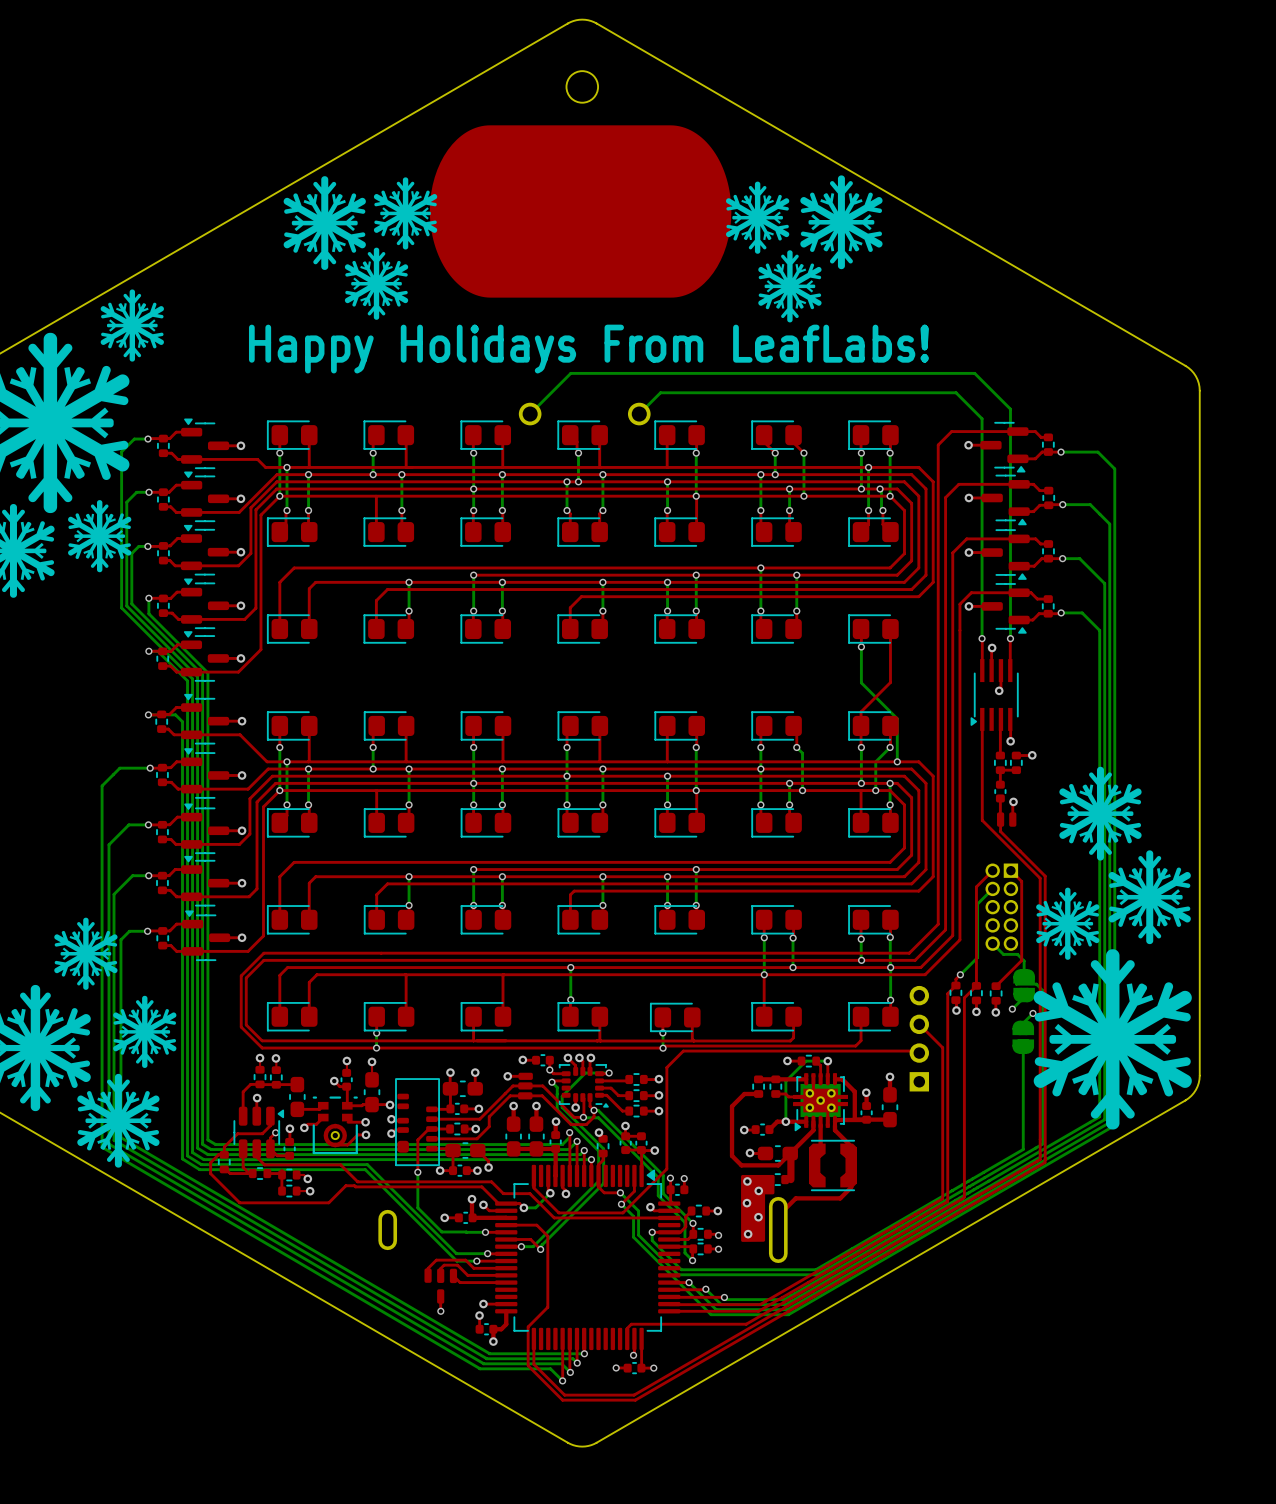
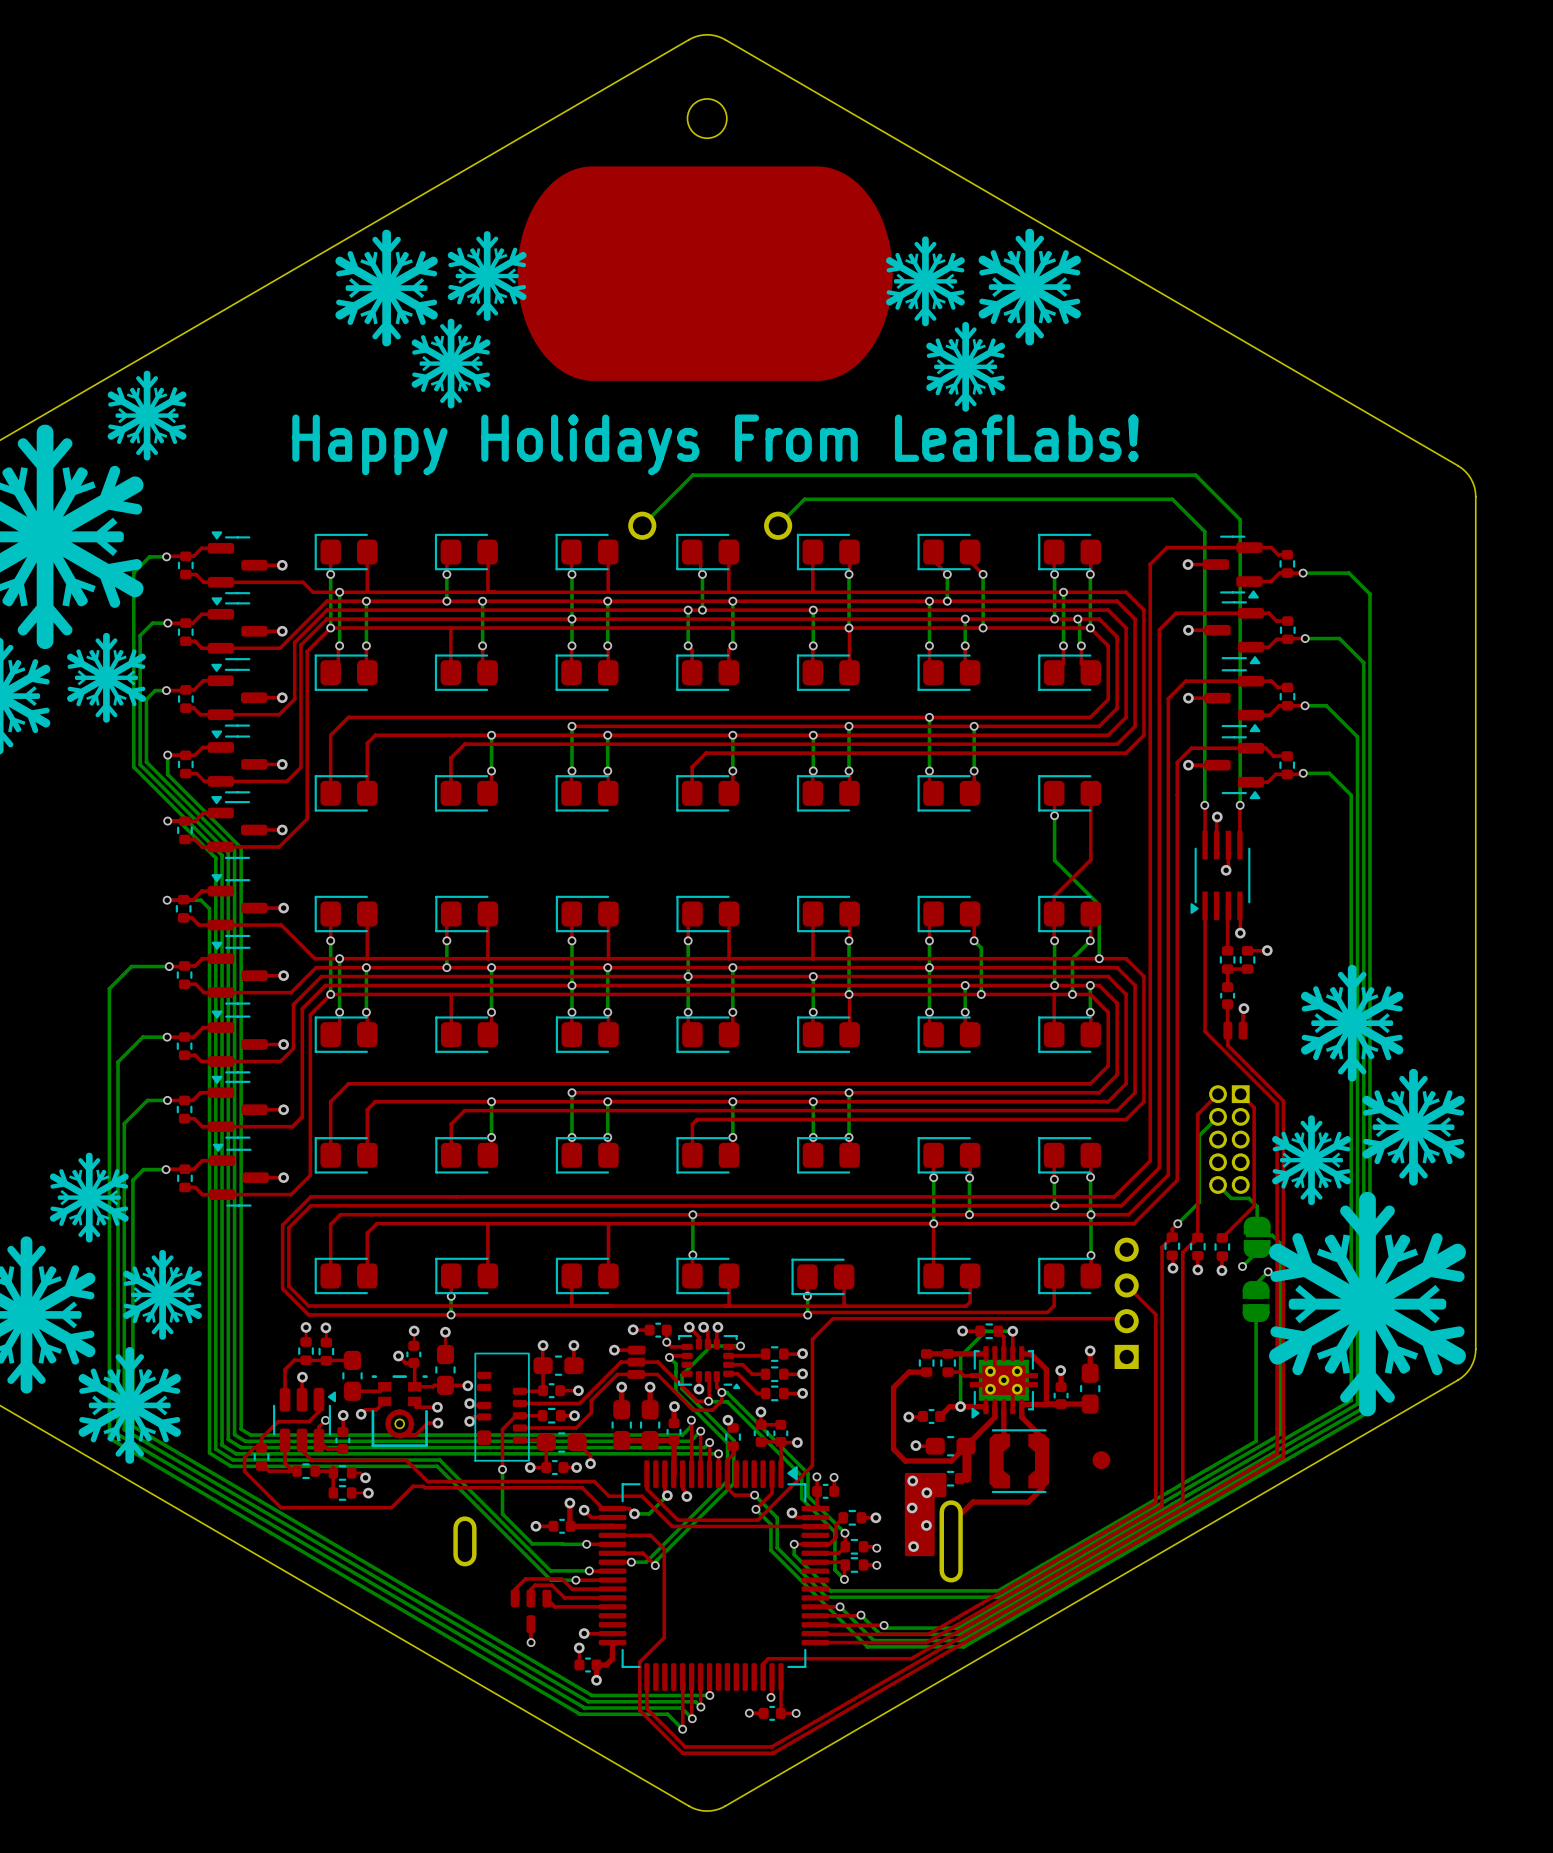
part: none -> (1101, 1460)

